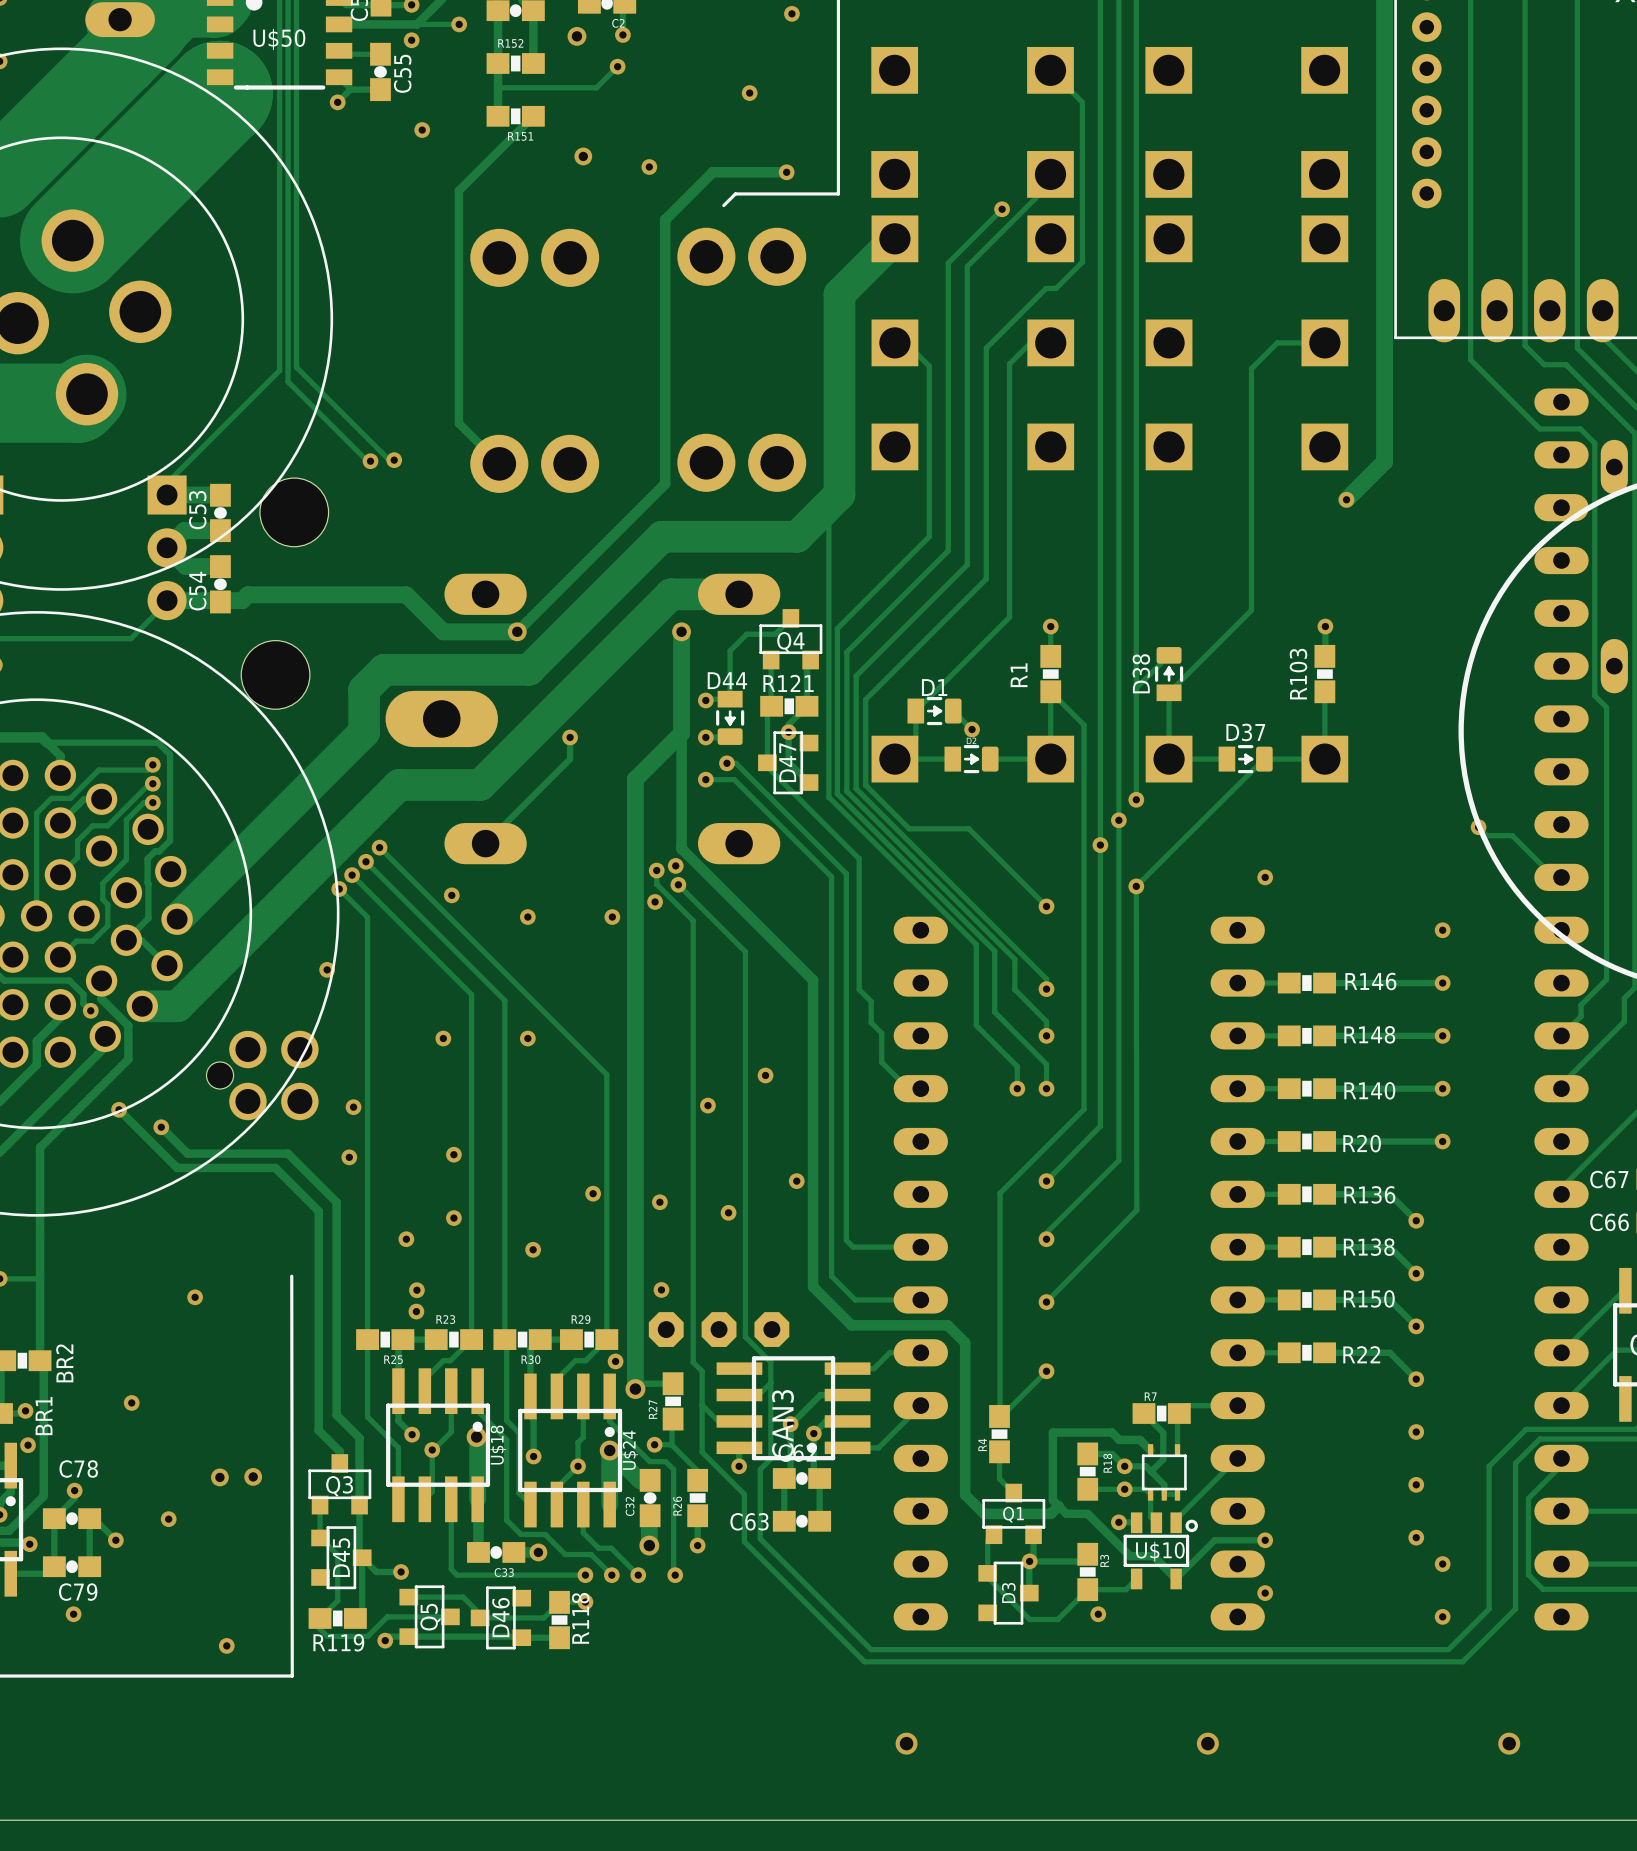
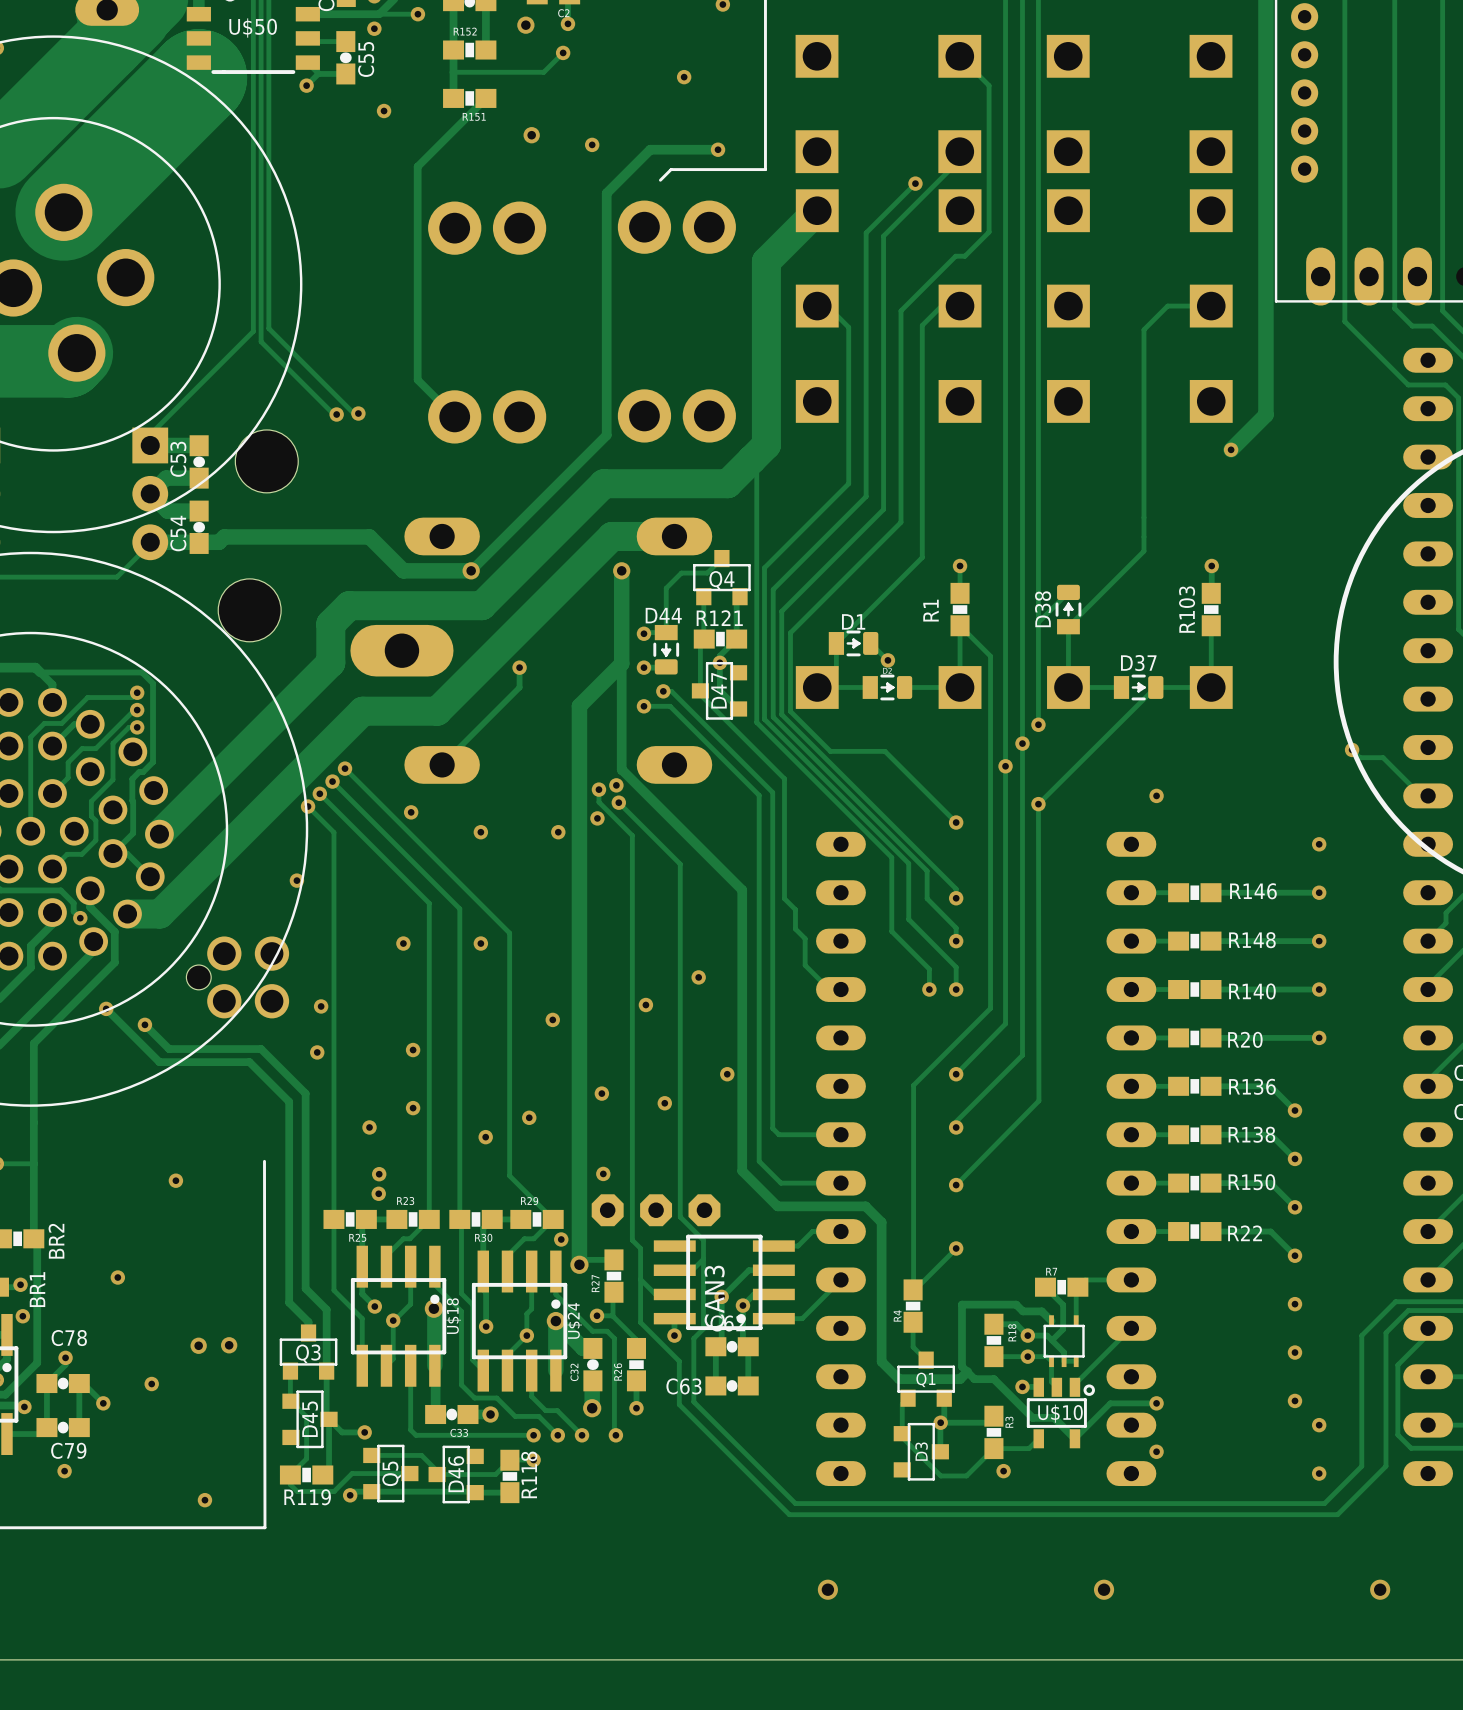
track: (559, 1027) (606, 1074) (606, 1339) -> (509, 933) (509, 1175) (553, 1219)
via: none -> (552, 1019)
via: (593, 1193) -> none
via: none -> (529, 1117)

